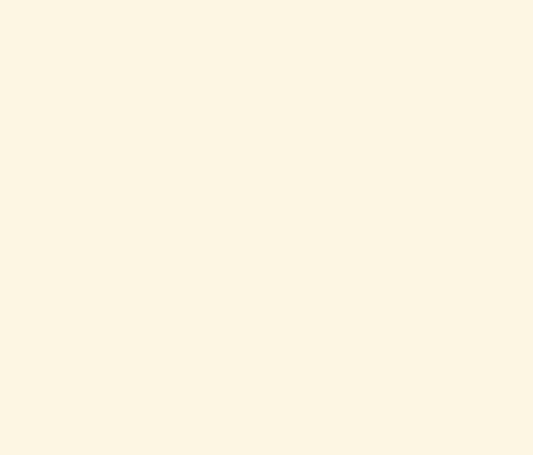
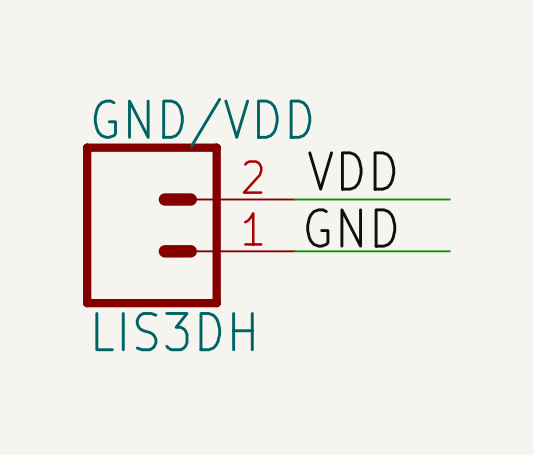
label: none -> VDD (351, 171)
wire: none -> (294, 199) (449, 199)
GND/VDD: none -> LIS3DH (188, 225)
label: none -> GND (351, 228)
wire: none -> (294, 251) (449, 251)

